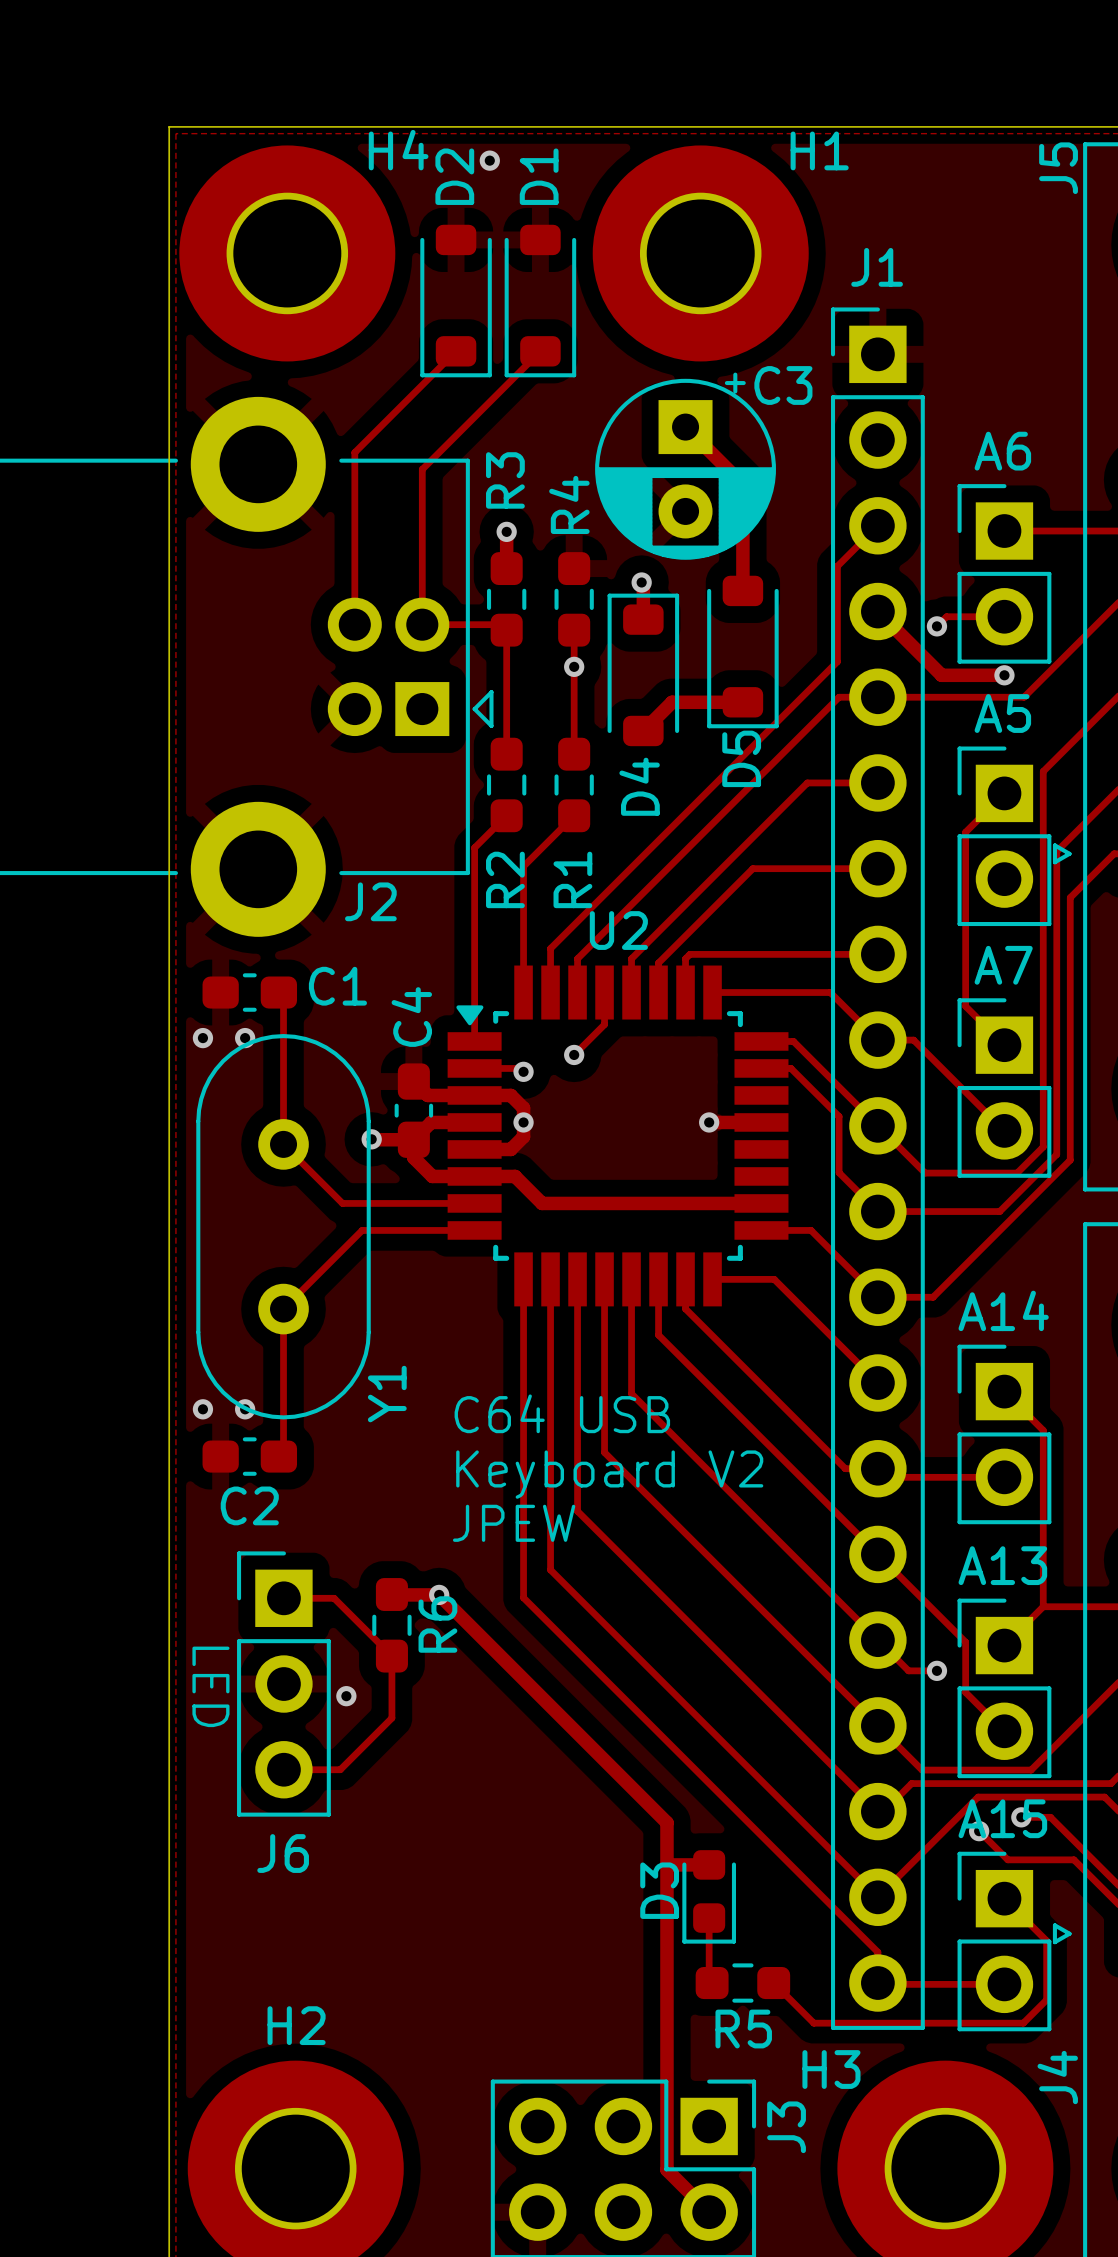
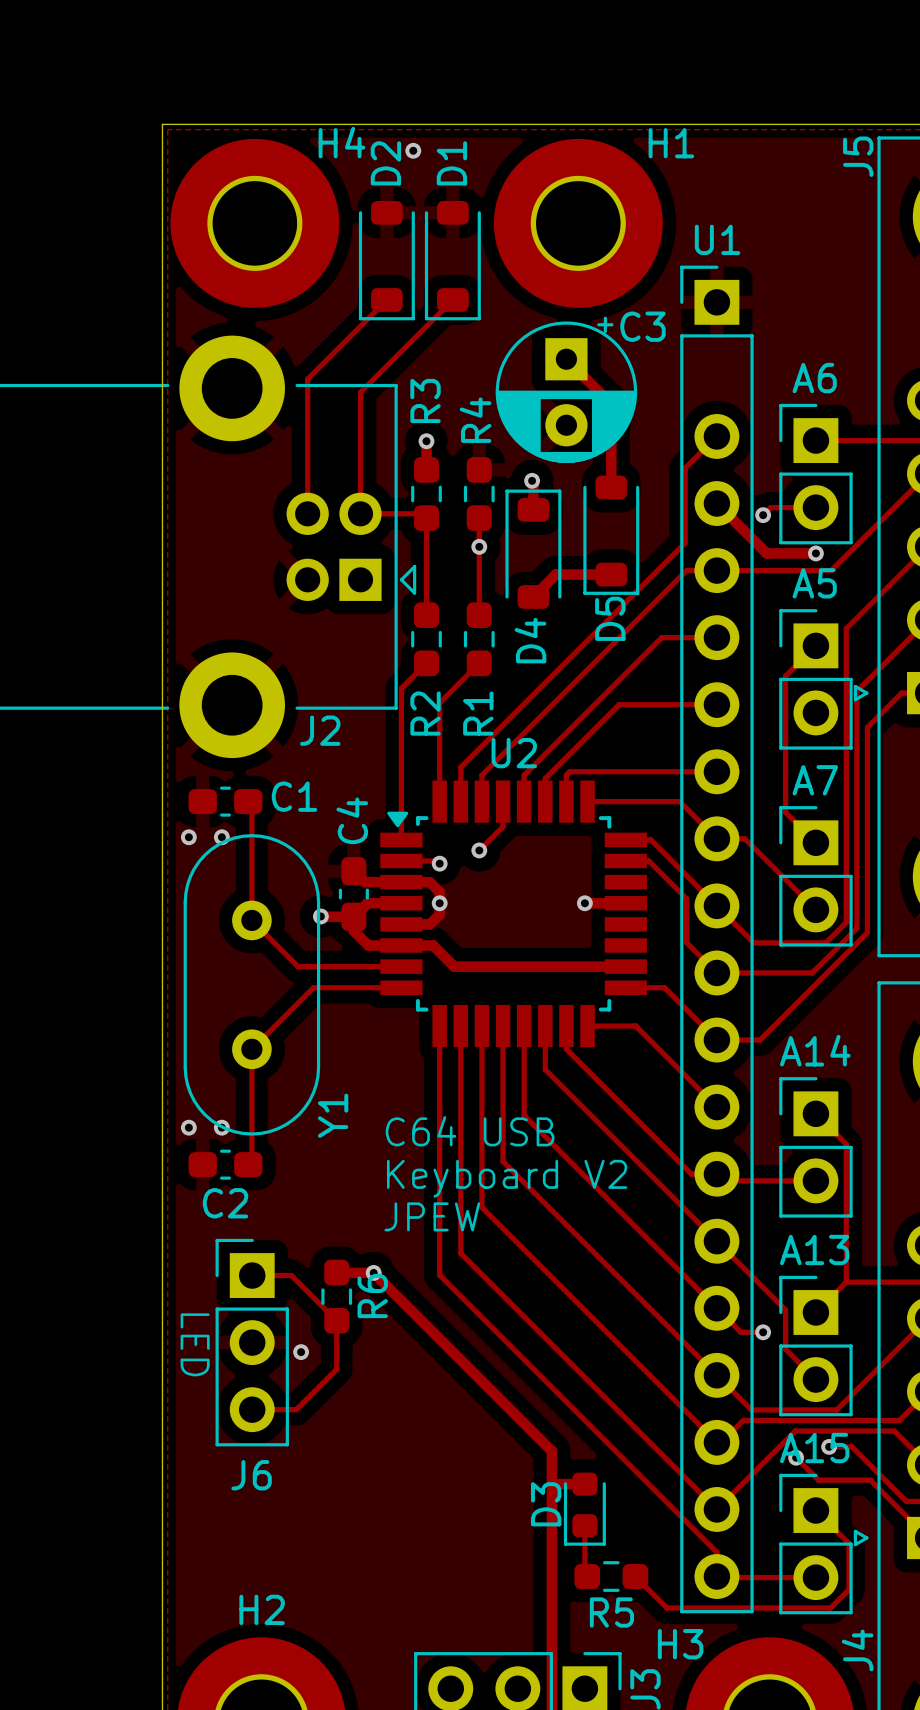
J1: (877, 1168) -> none
U1: none -> (716, 939)

